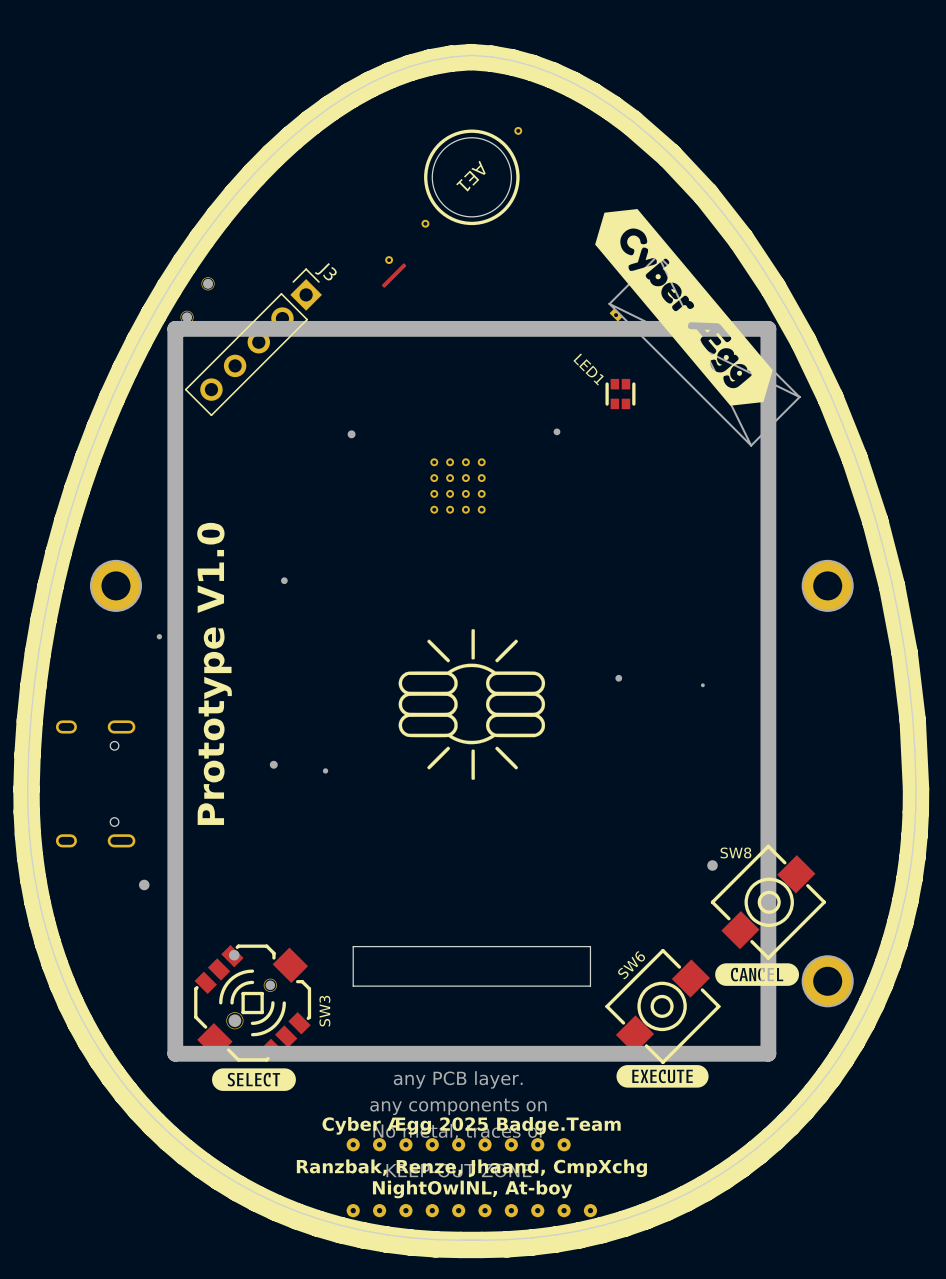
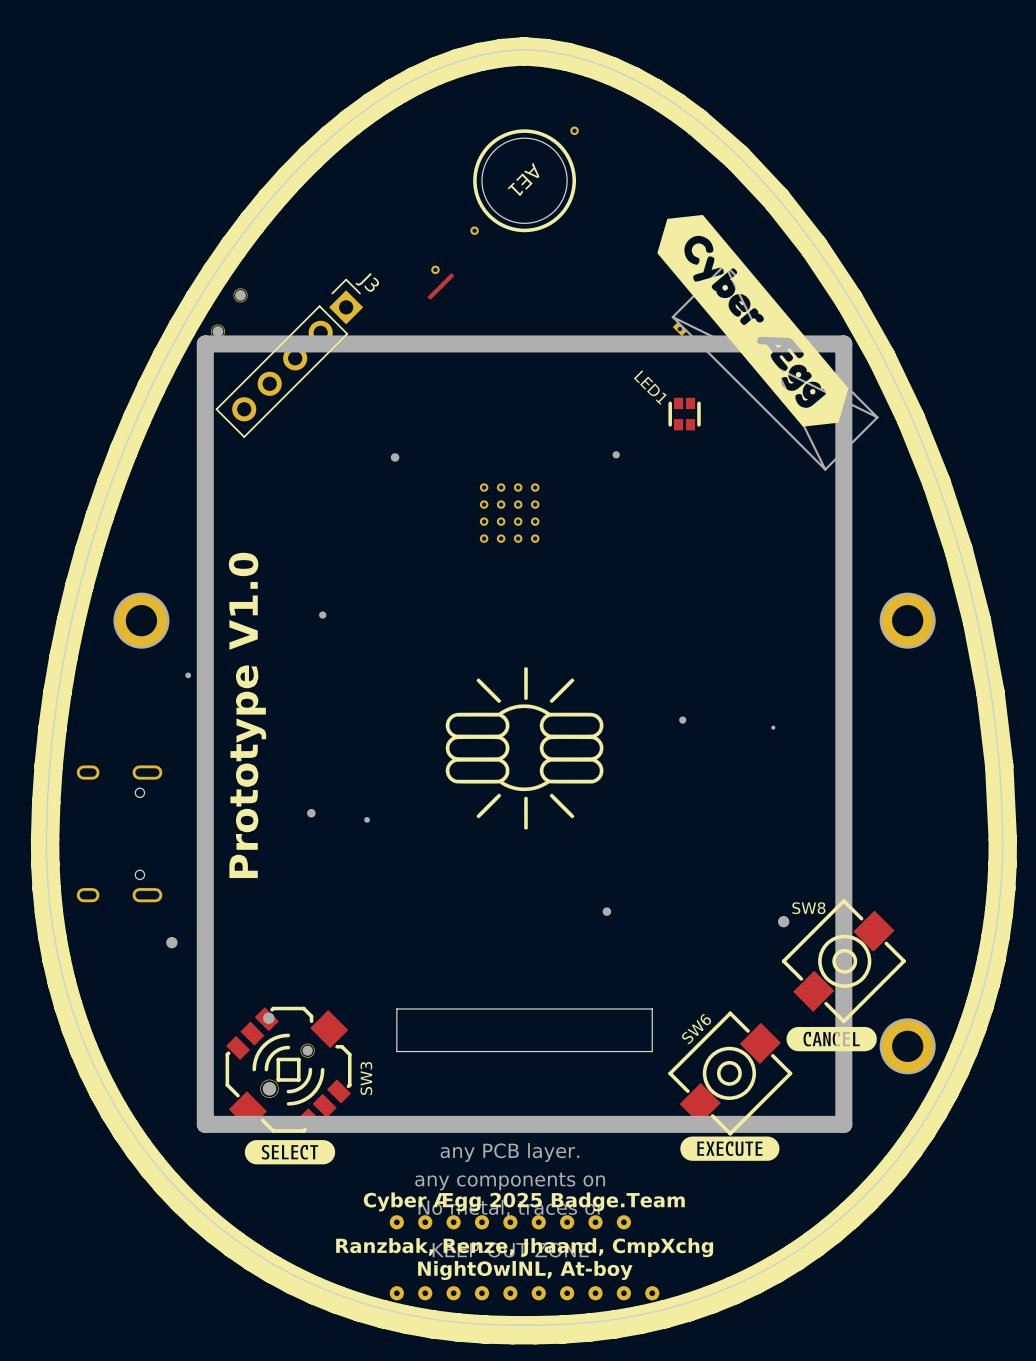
part: none -> (606, 911)

